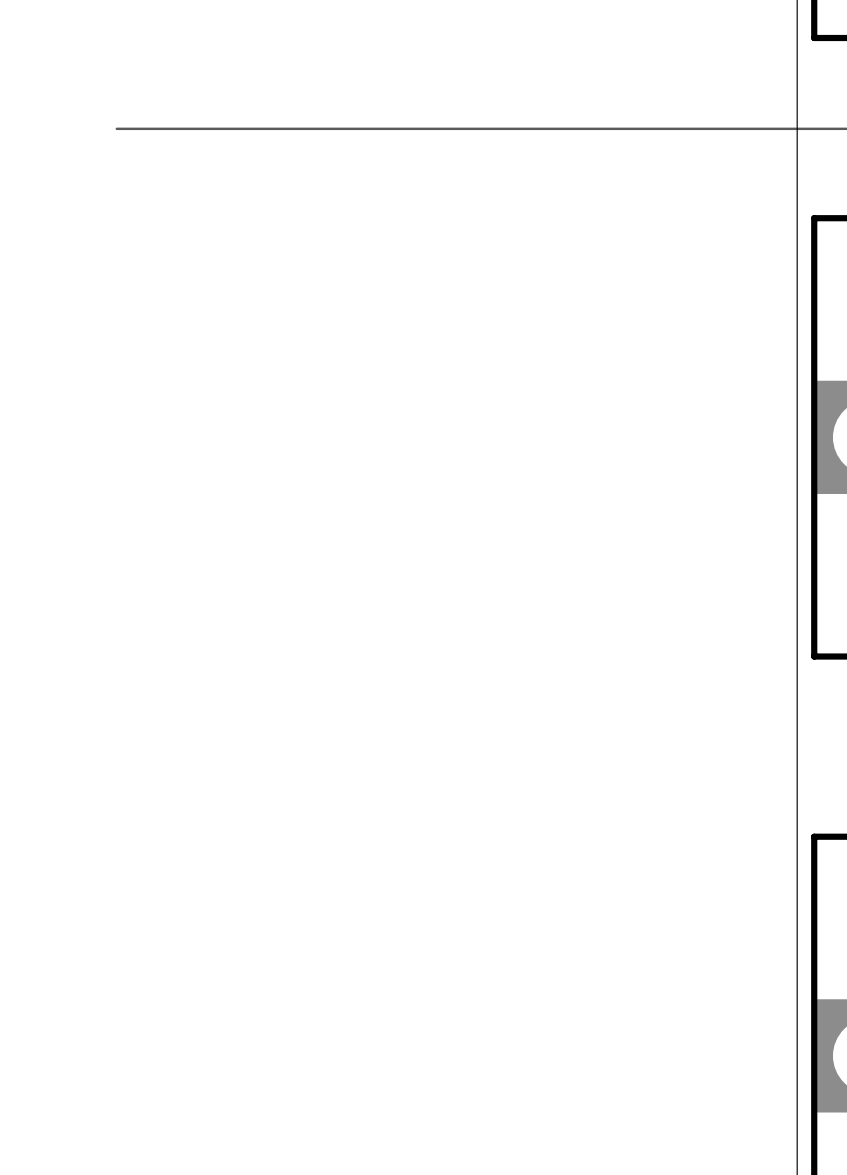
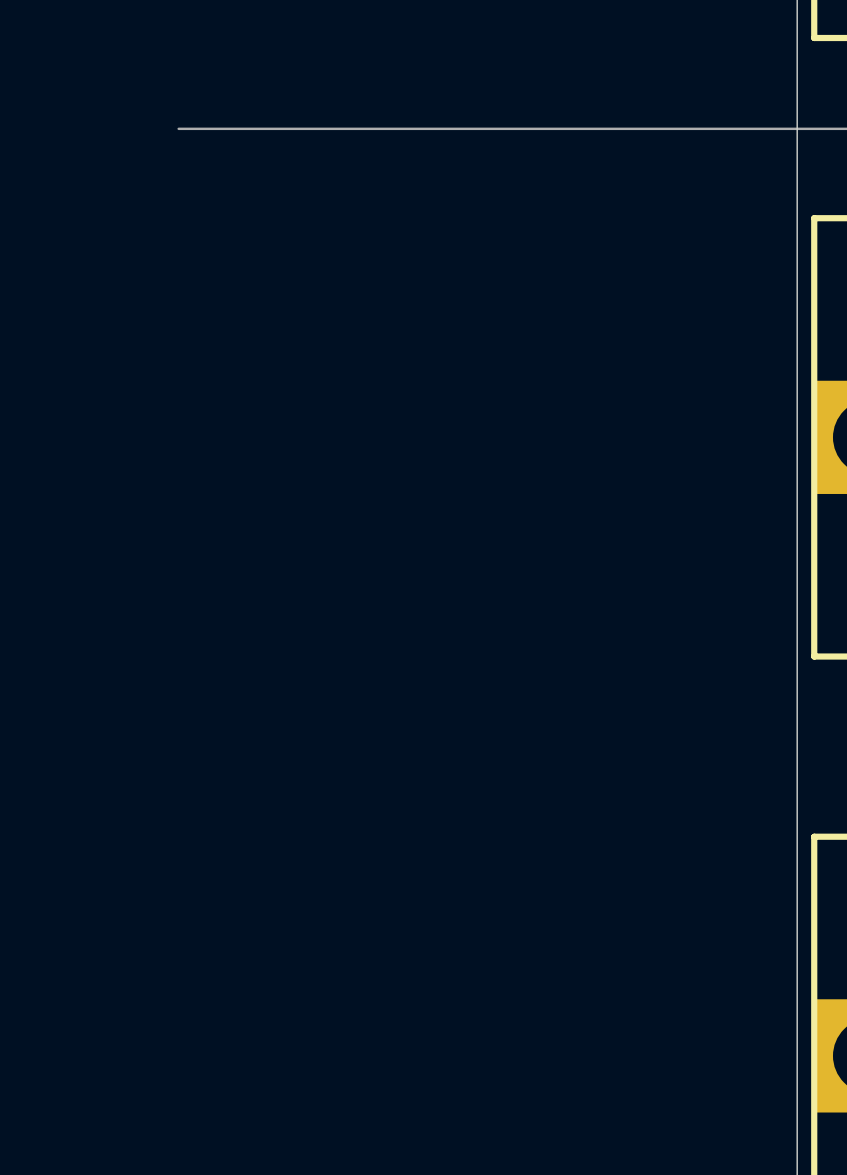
line: (116, 128) (178, 128) -> none

